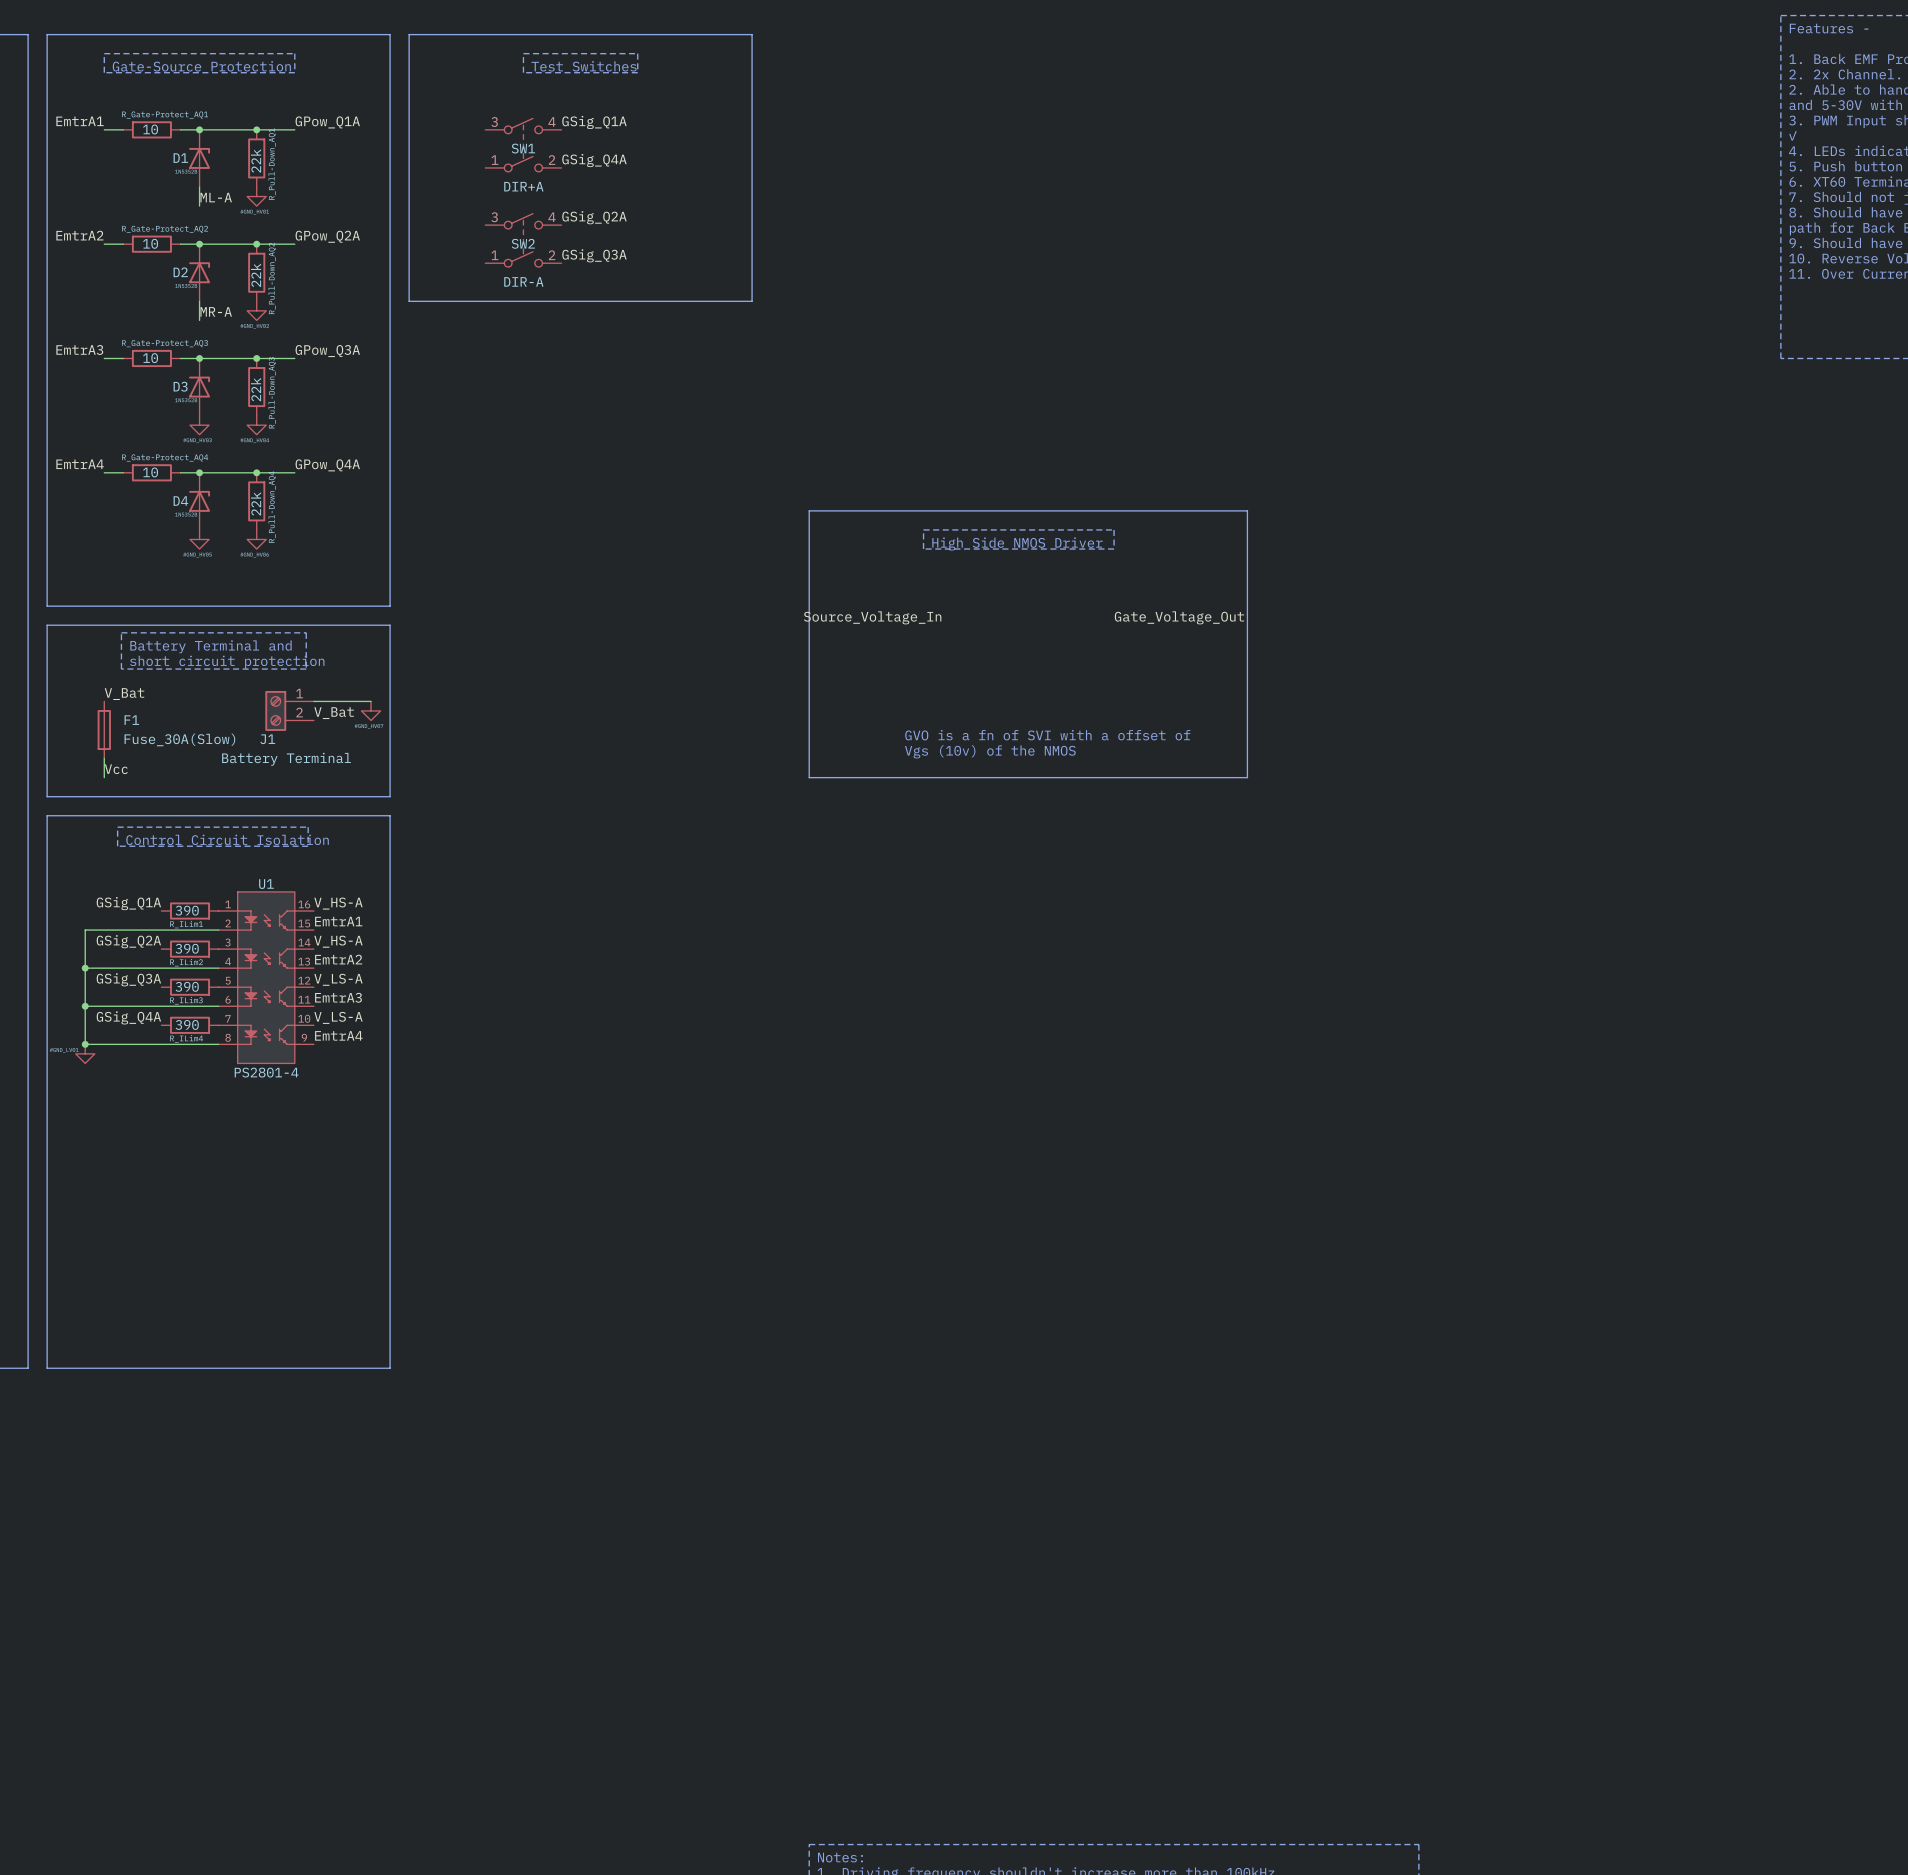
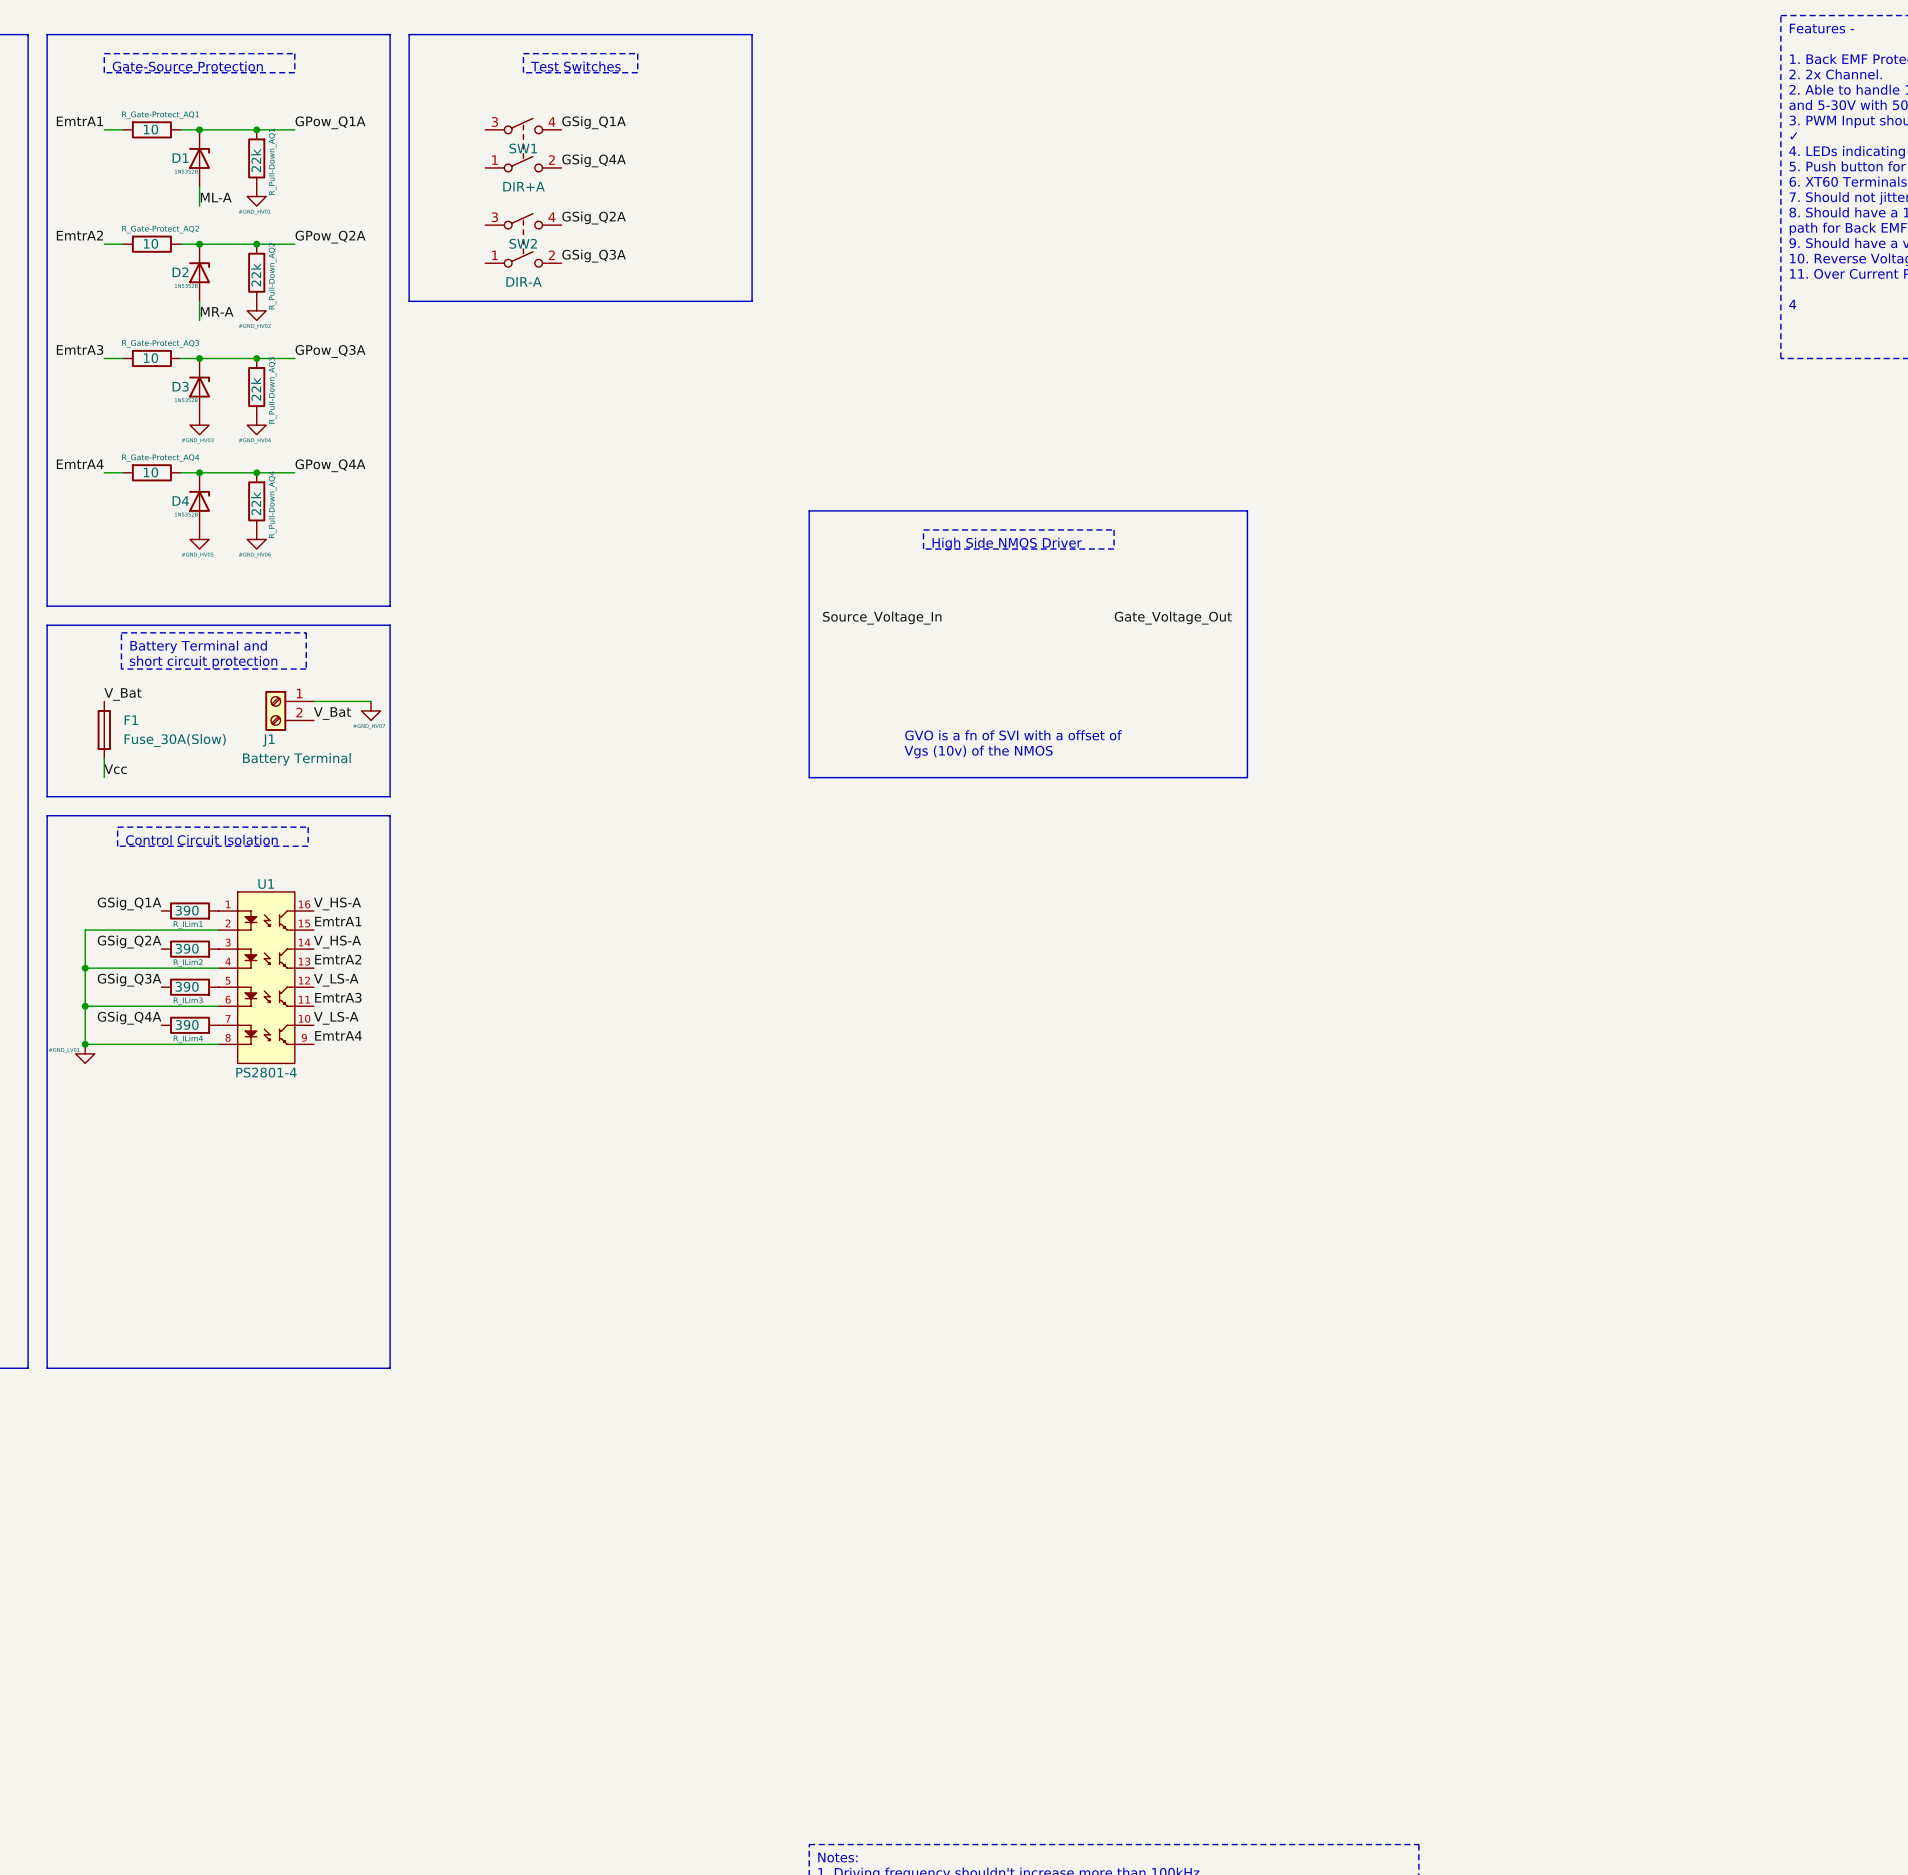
text: none -> 4 (1792, 304)

